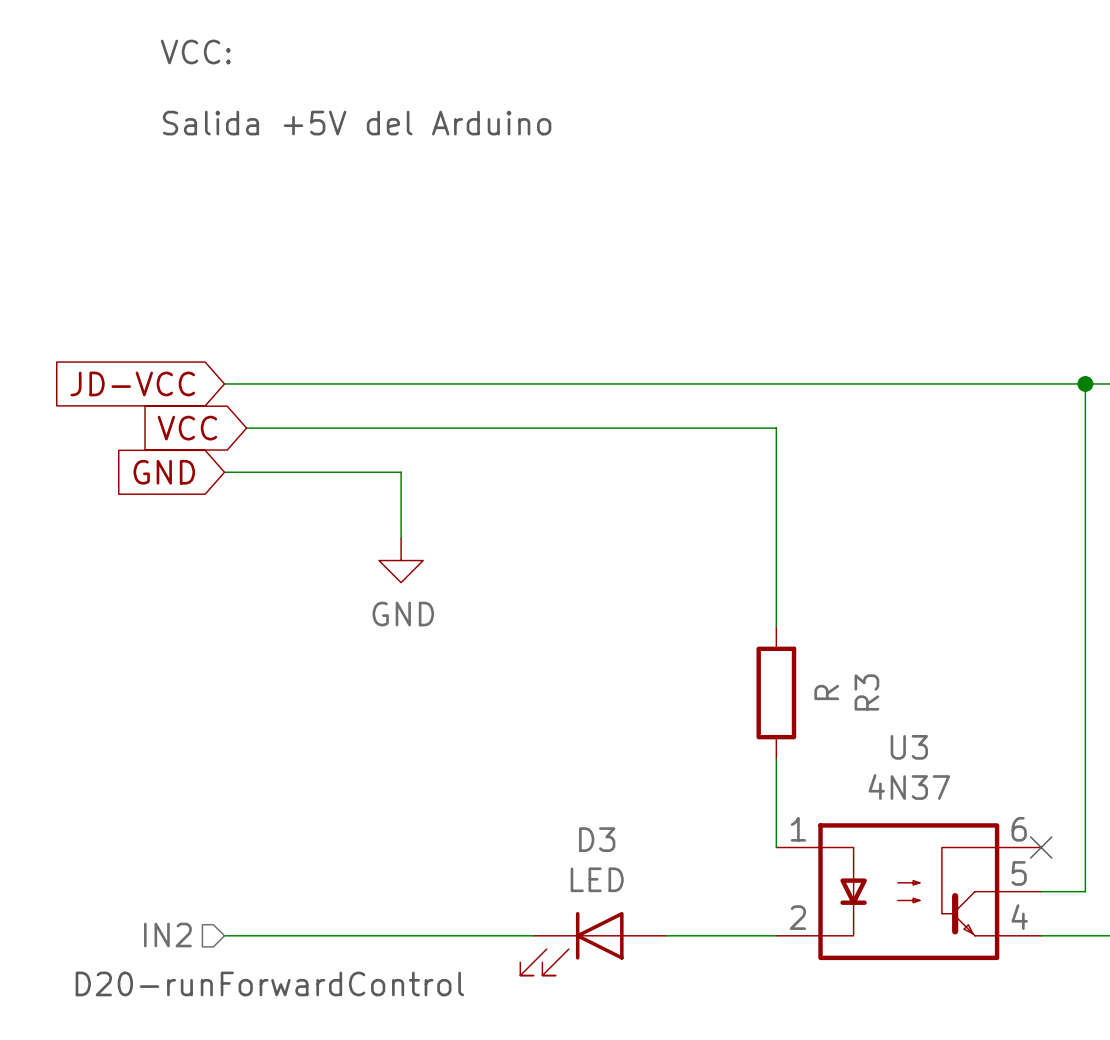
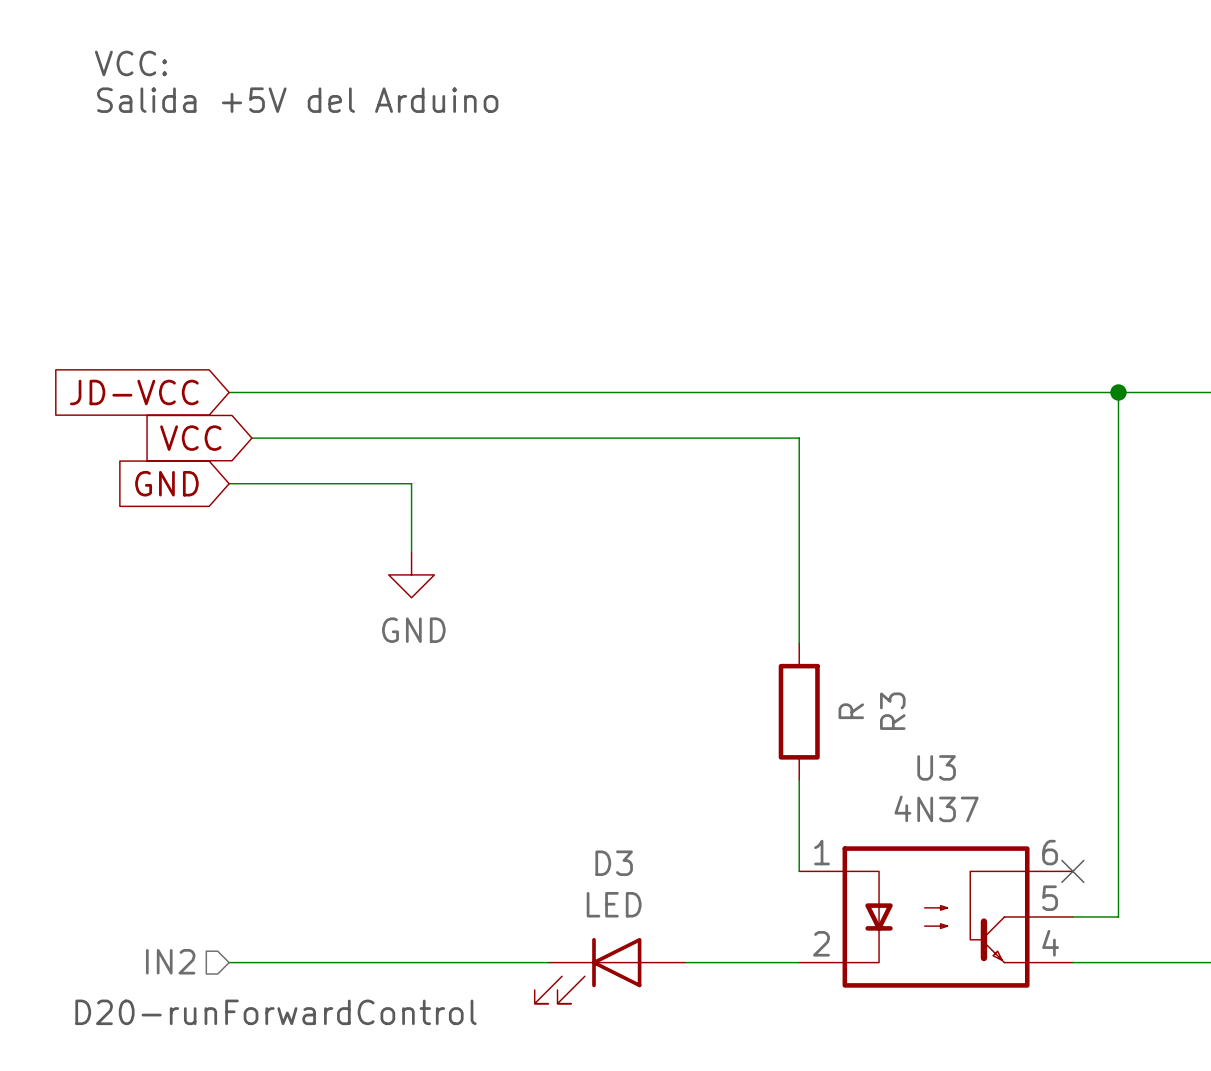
text position: VCC: (195, 51) -> VCC: (131, 63)
text position: Salida +5V del Arduino (357, 123) -> Salida +5V del Arduino (297, 100)

